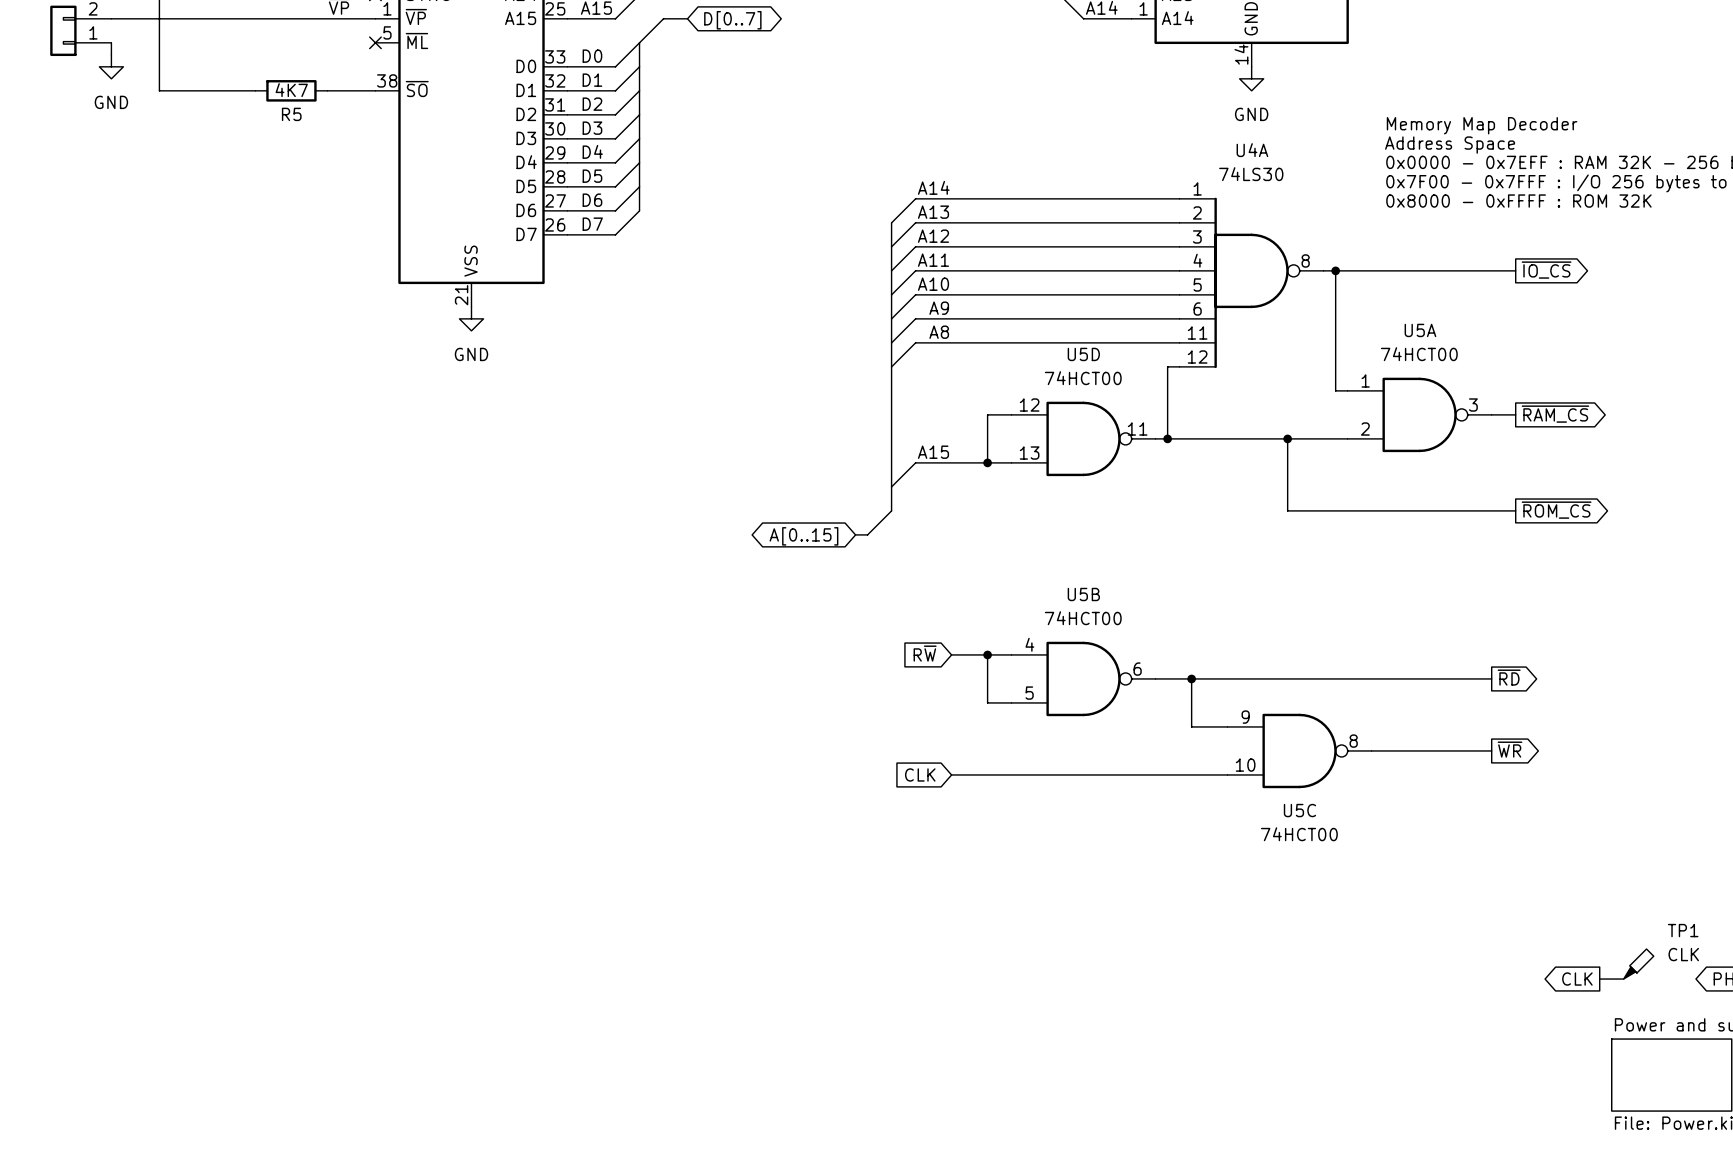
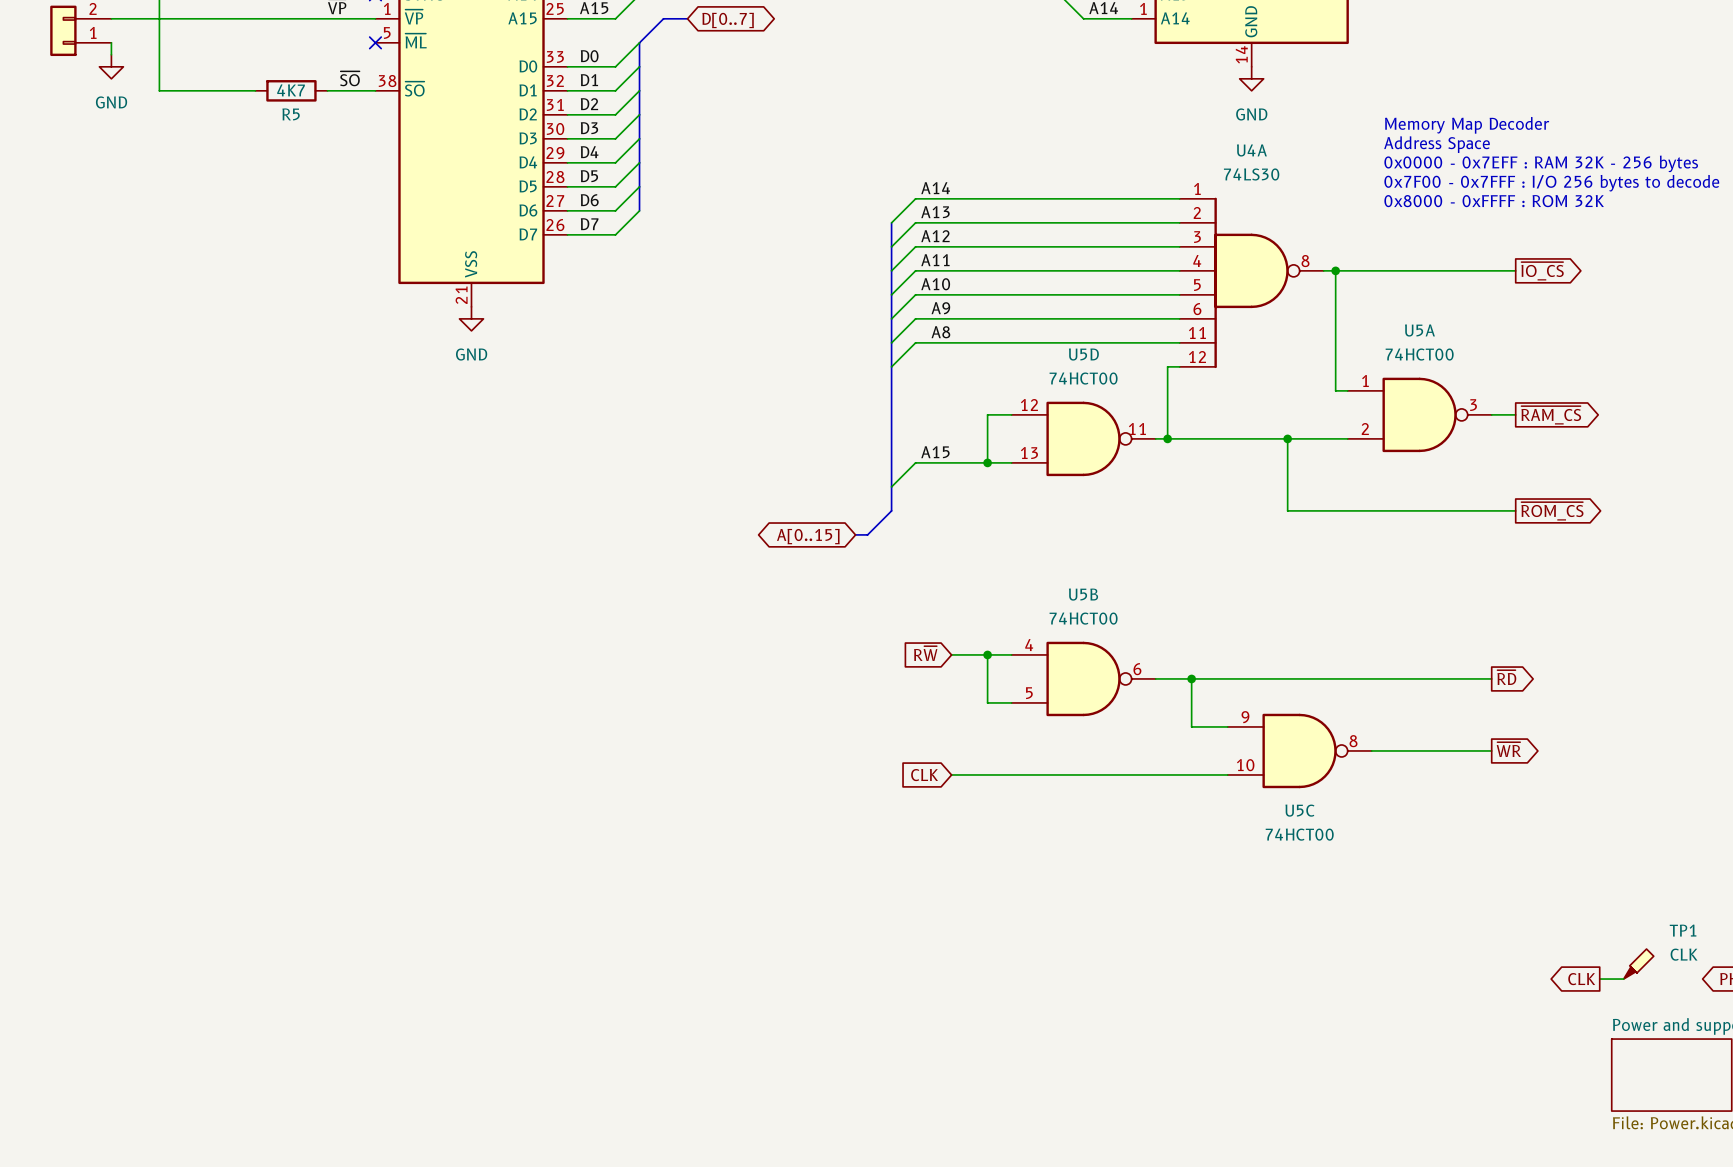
label: none -> ~{SO} (349, 78)

